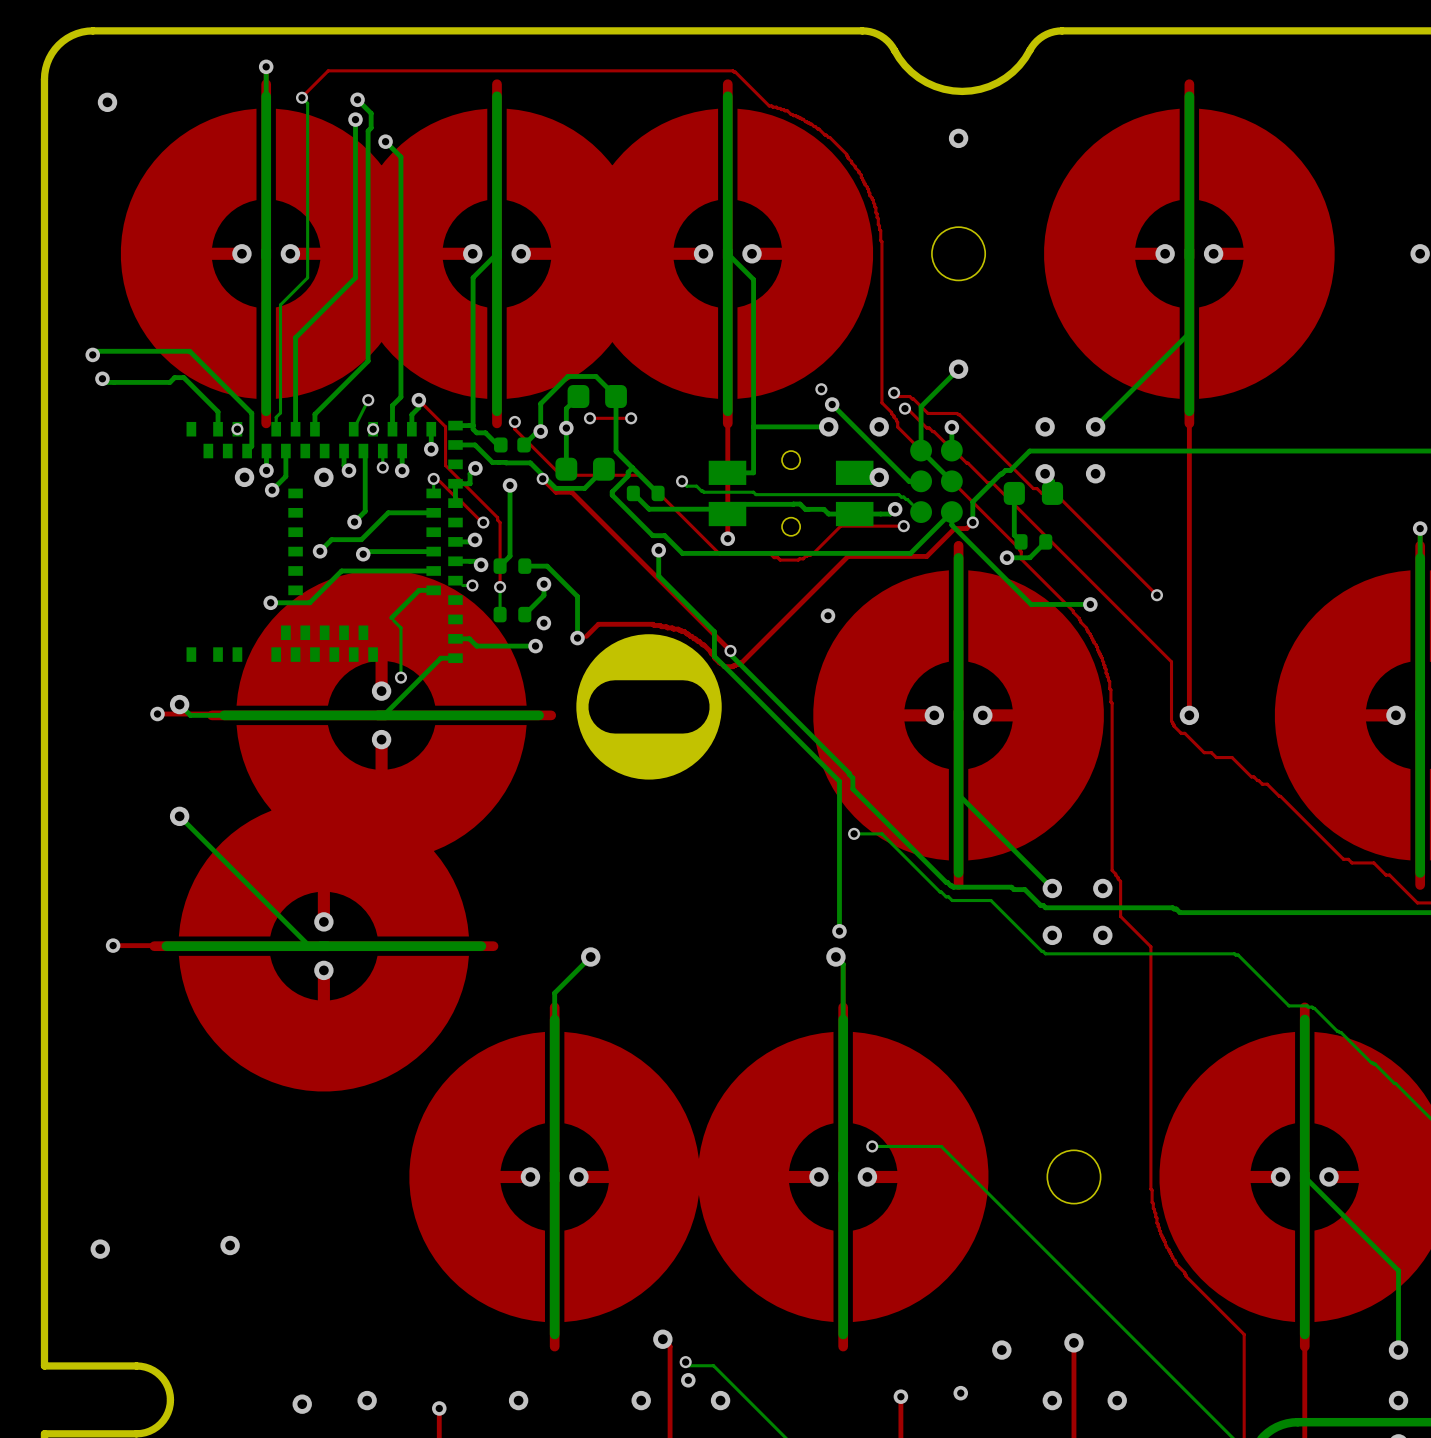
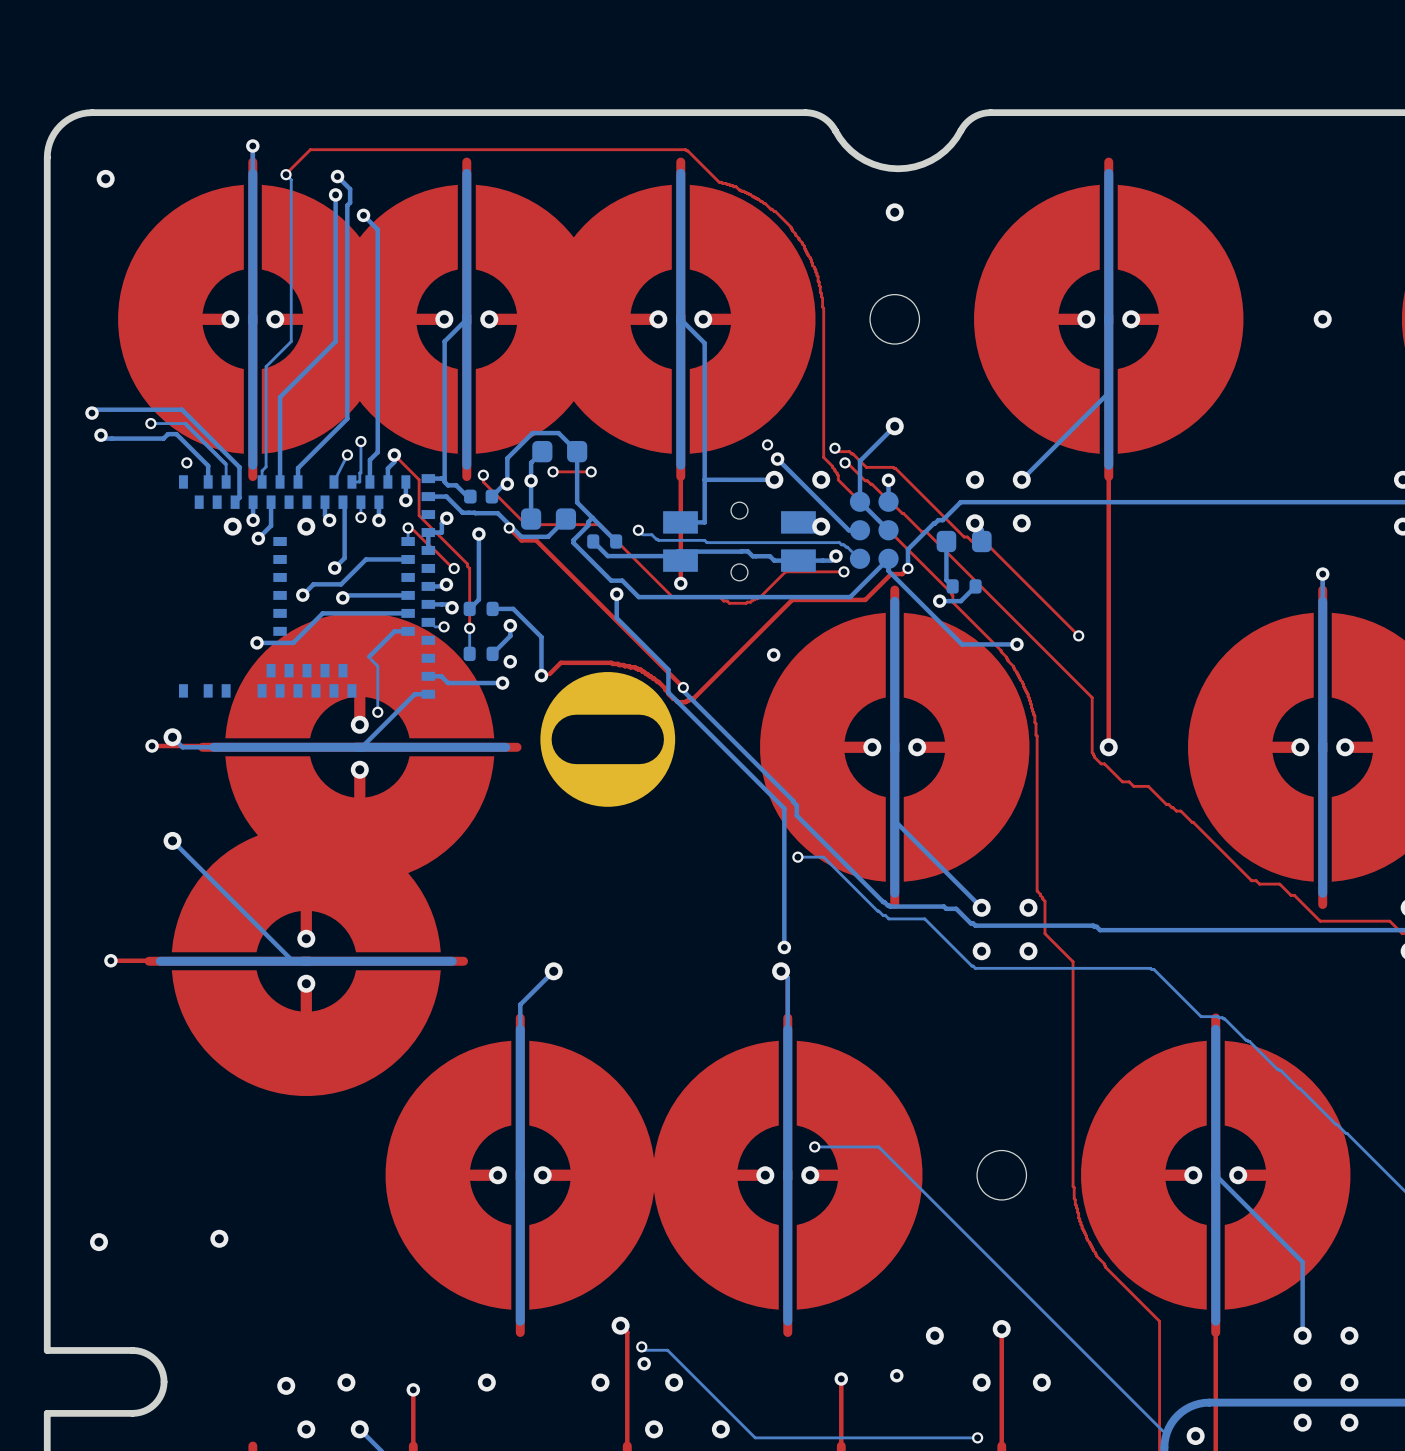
bottom track: none -> (150, 423) (185, 423) (226, 464) (226, 481)
via: none -> (150, 423)
bottom track: none -> (360, 441) (359, 481) (351, 481)
via position: (237, 429) -> (186, 462)
via position: (373, 429) -> (360, 441)

